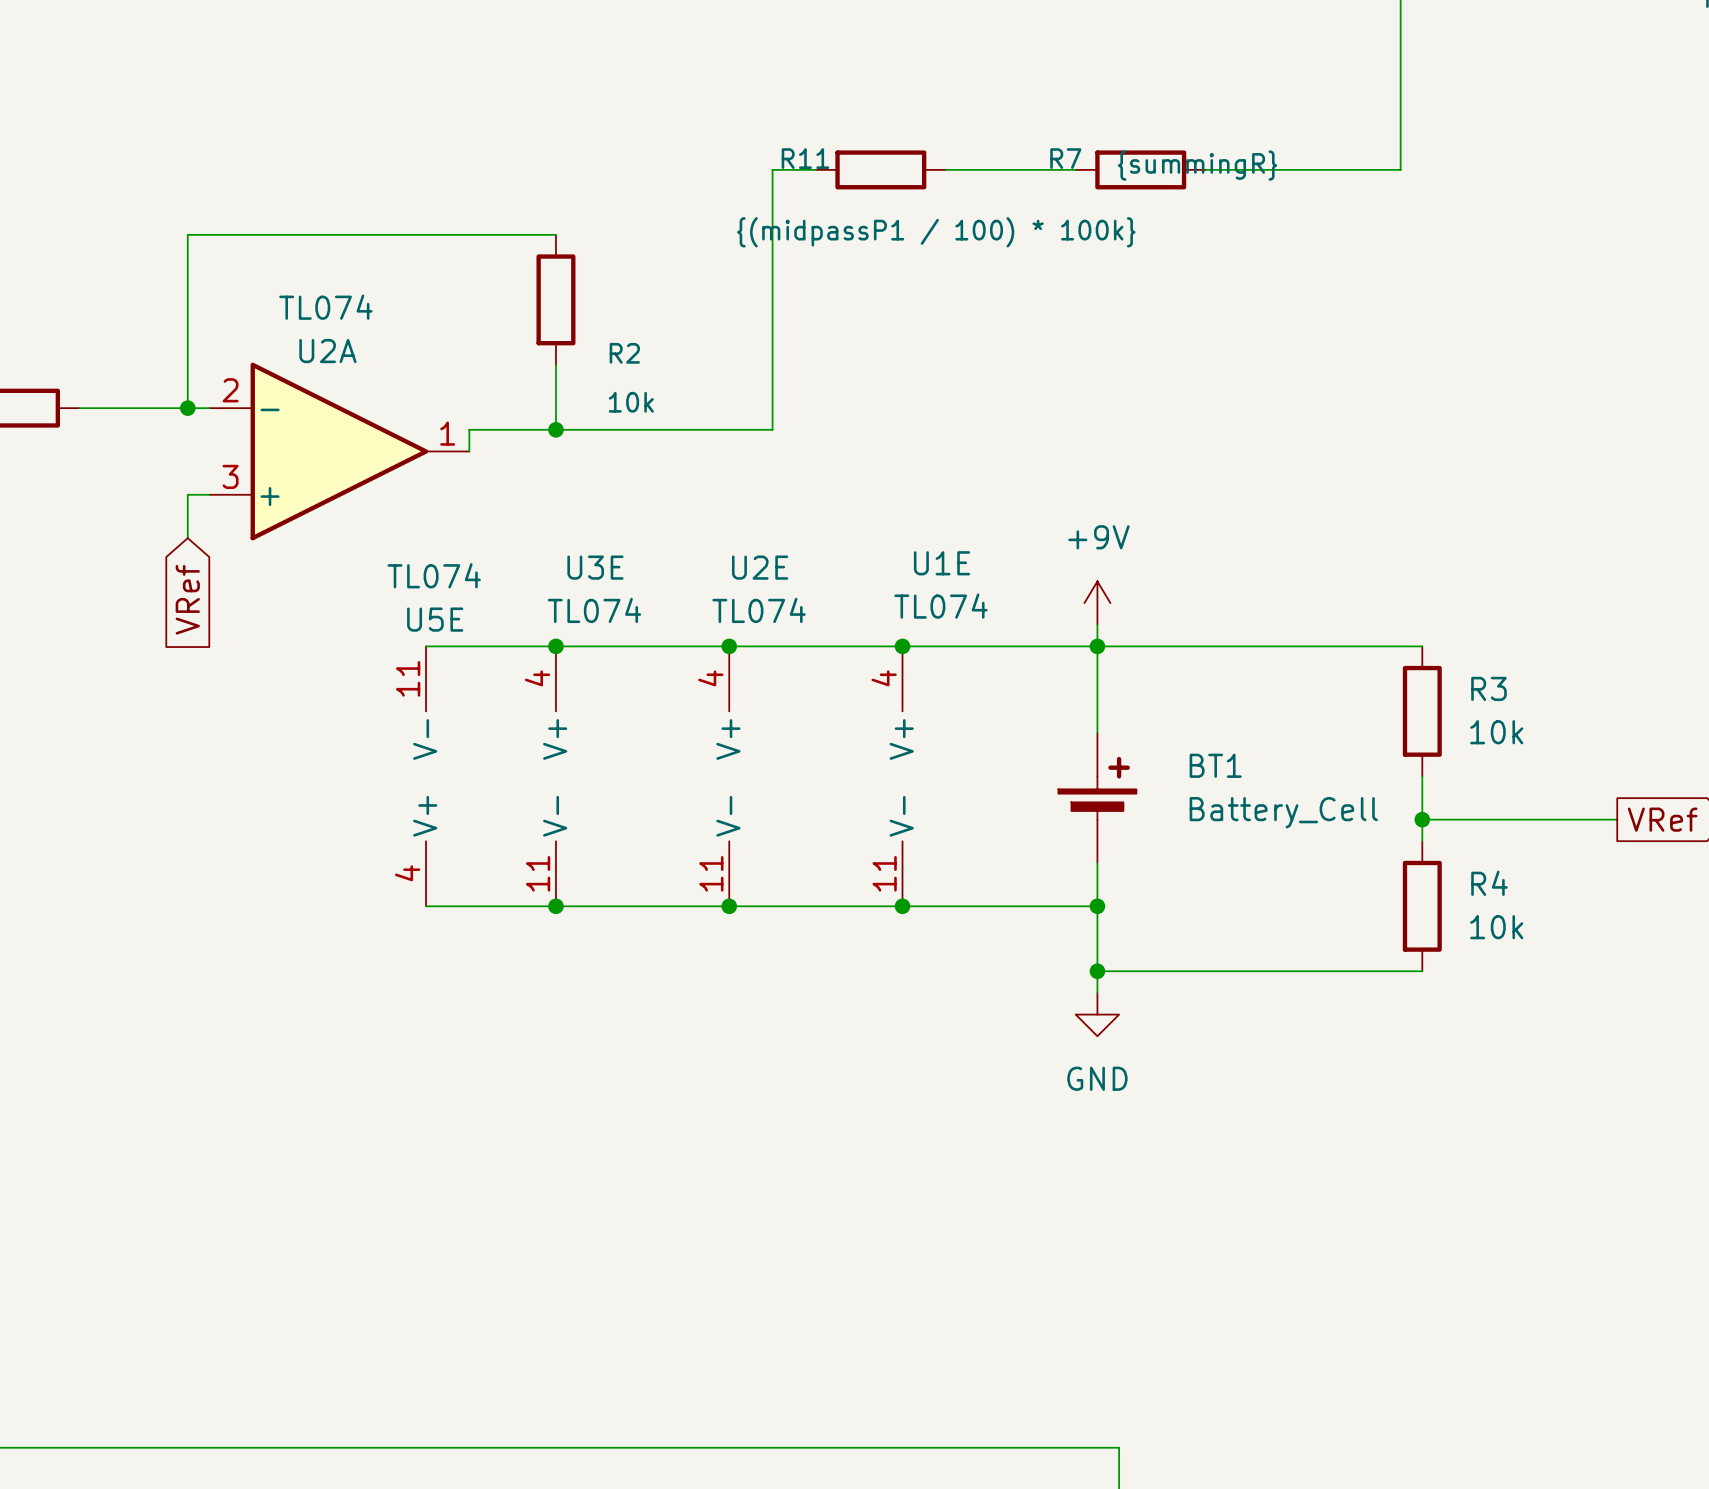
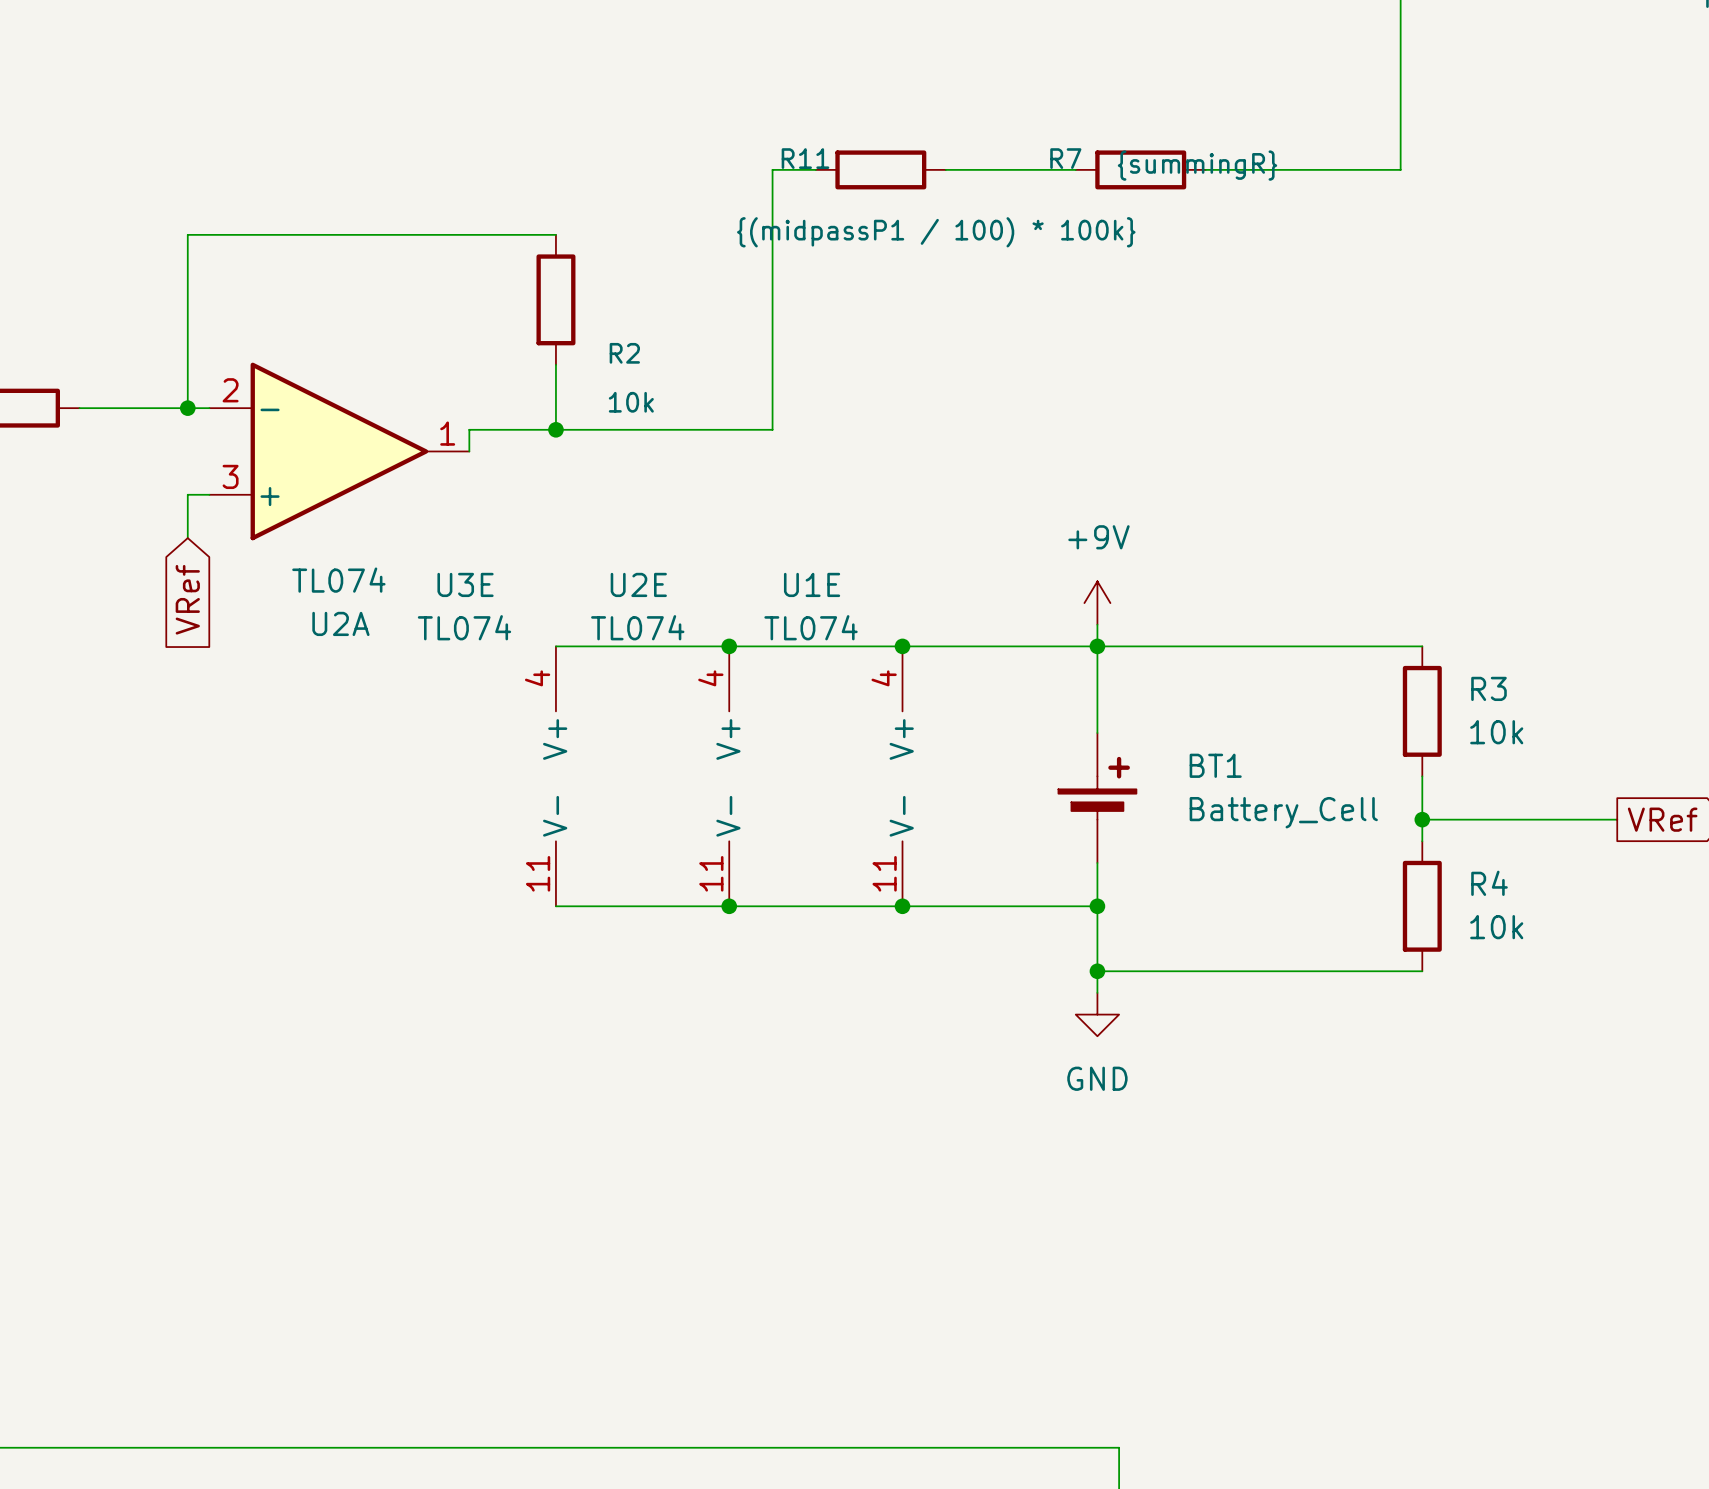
U2A value position: TL074 (325, 307) -> TL074 (338, 580)
U2A name position: U2A (327, 351) -> U2A (340, 623)
U1E name position: U1E (942, 563) -> U1E (812, 584)
U3E name position: U3E (595, 567) -> U3E (465, 584)
U2E name position: U2E (760, 567) -> U2E (638, 584)
U1E value position: TL074 (940, 606) -> TL074 (811, 627)
U3E value position: TL074 (594, 610) -> TL074 (464, 627)
U2E value position: TL074 (759, 610) -> TL074 (637, 627)
wire: (426, 646) (555, 646) -> none
junction: (555, 646) -> none
U5E: TL074 (426, 776) -> none
wire: (426, 906) (555, 906) -> none
junction: (555, 906) -> none

